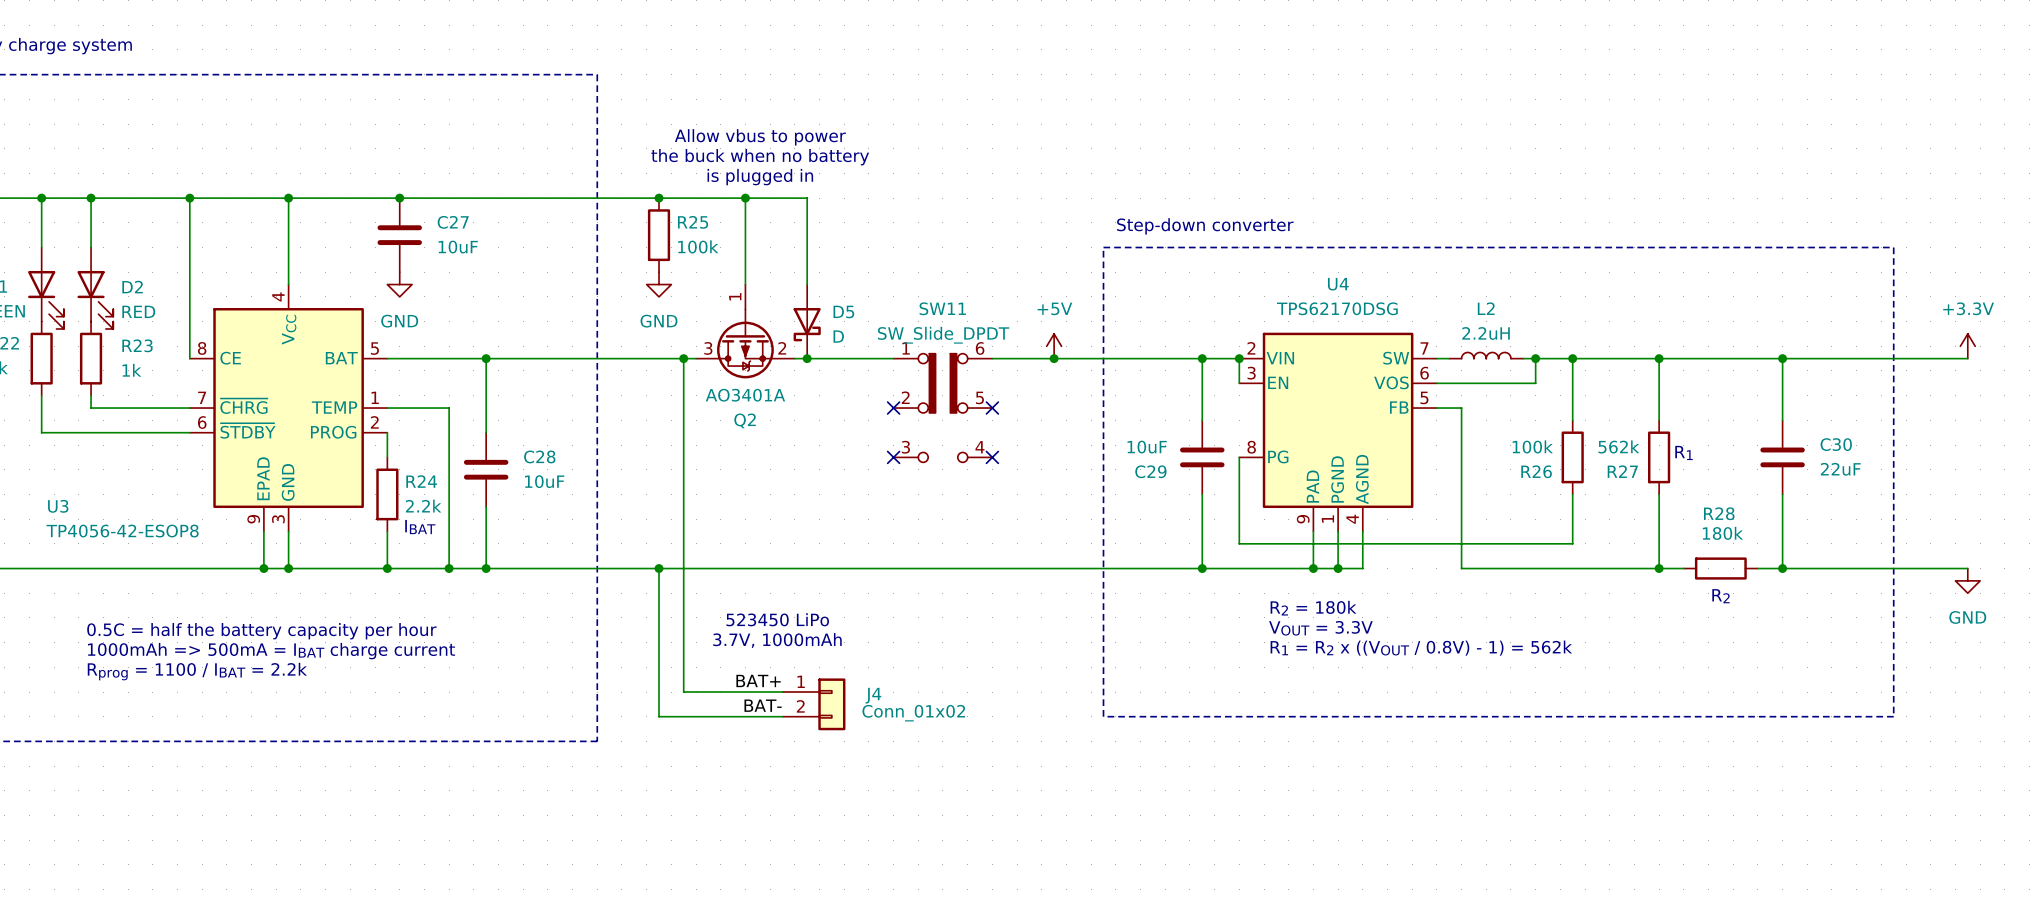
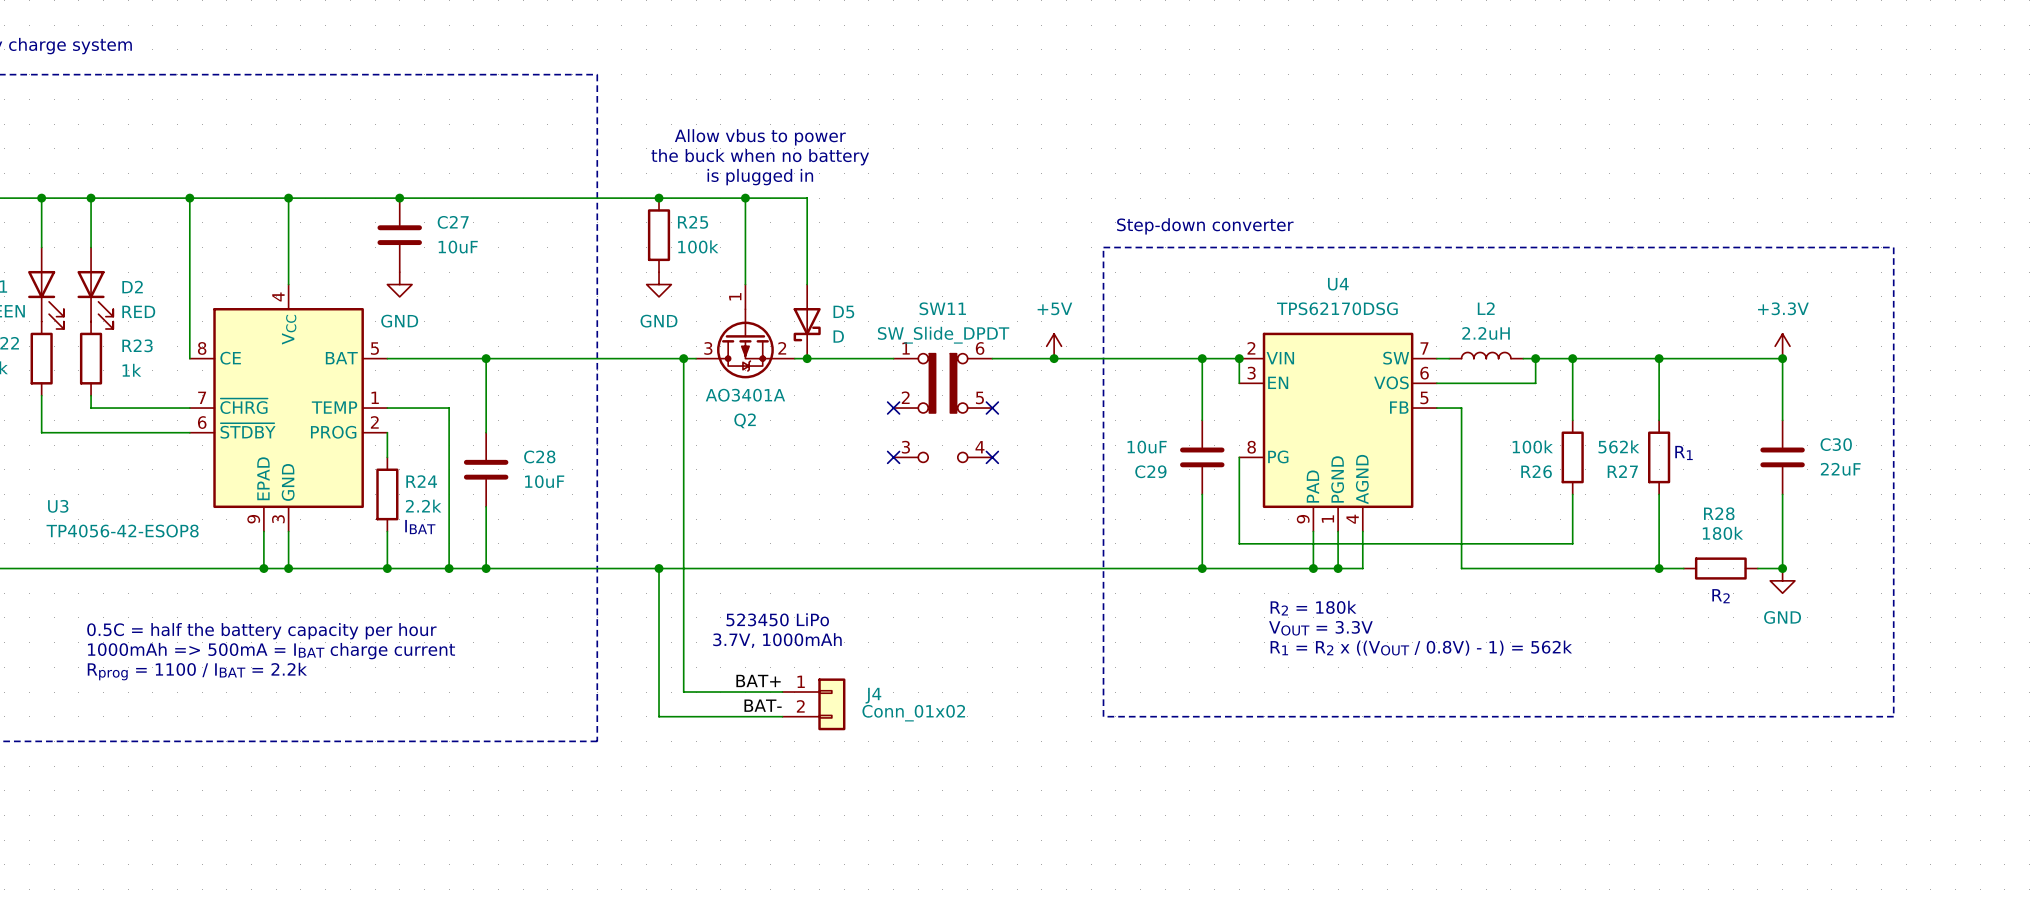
power symbol position: +3.3V (1967, 346) -> +3.3V (1782, 346)
wire: (1782, 358) (1967, 358) -> none
wire: (1782, 568) (1967, 568) -> none
power symbol position: GND (1967, 580) -> GND (1782, 580)

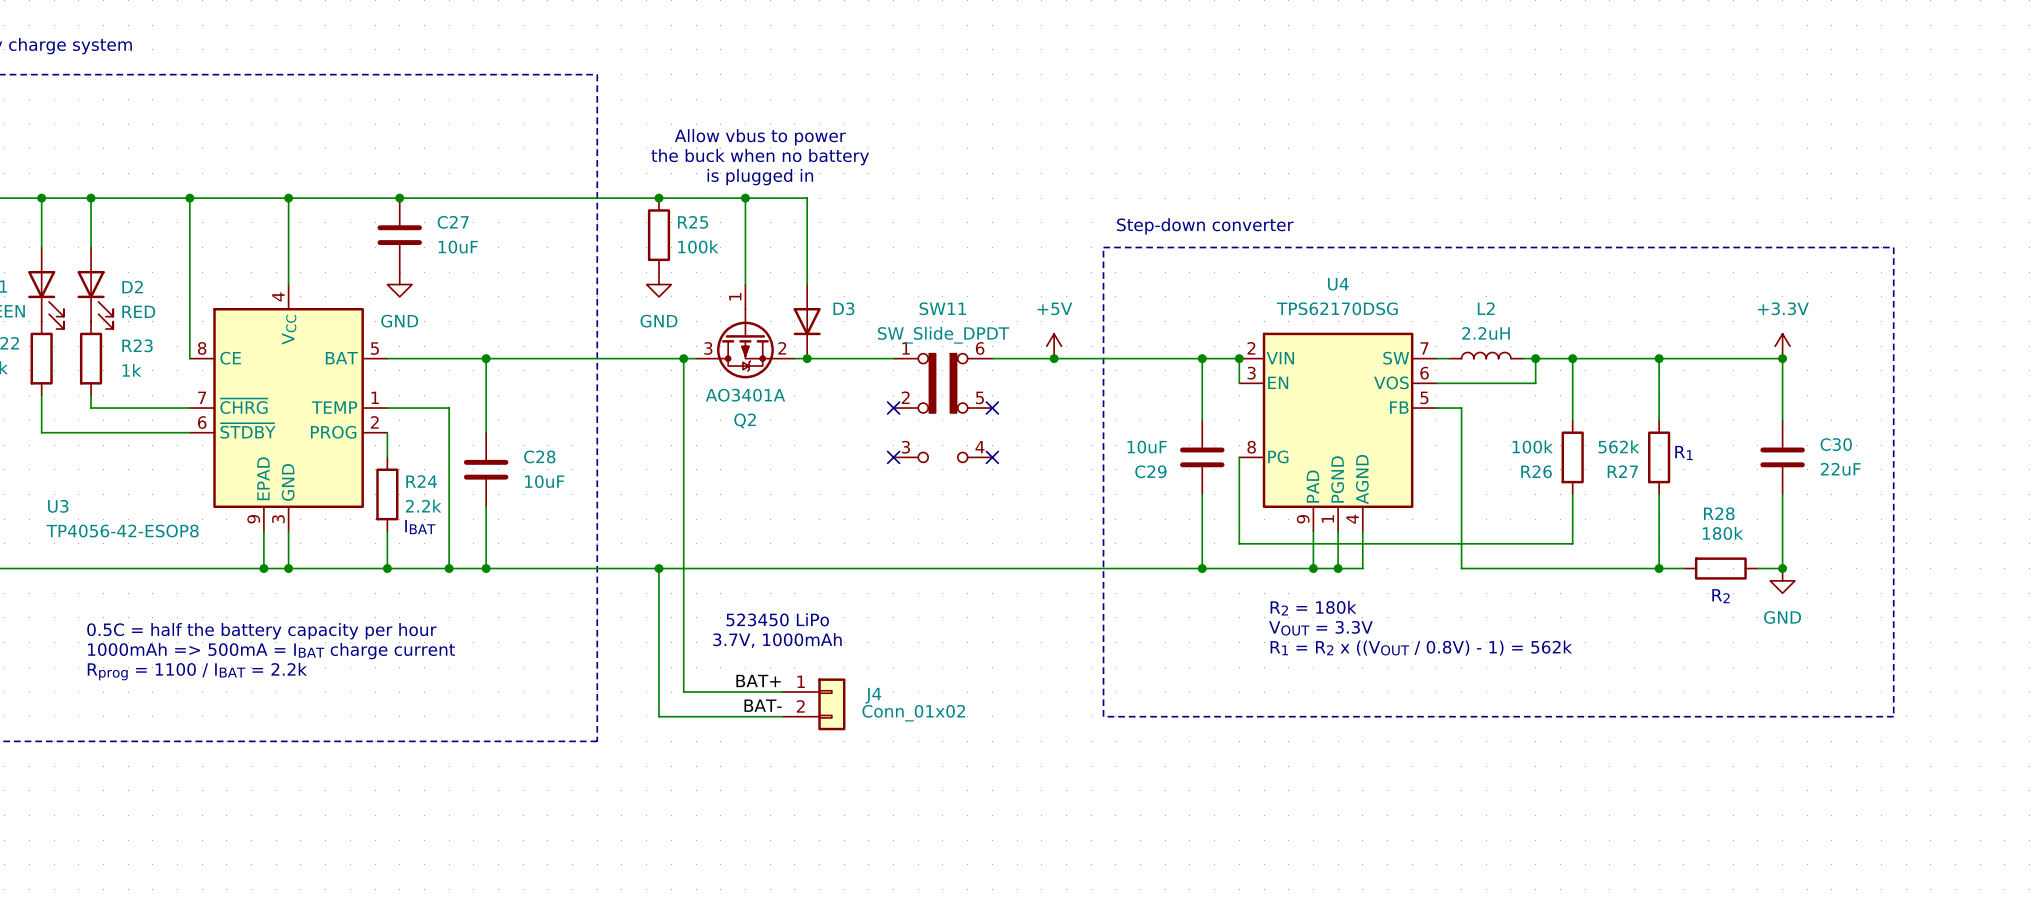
D5: D (807, 321) -> none
D3: none -> (807, 321)

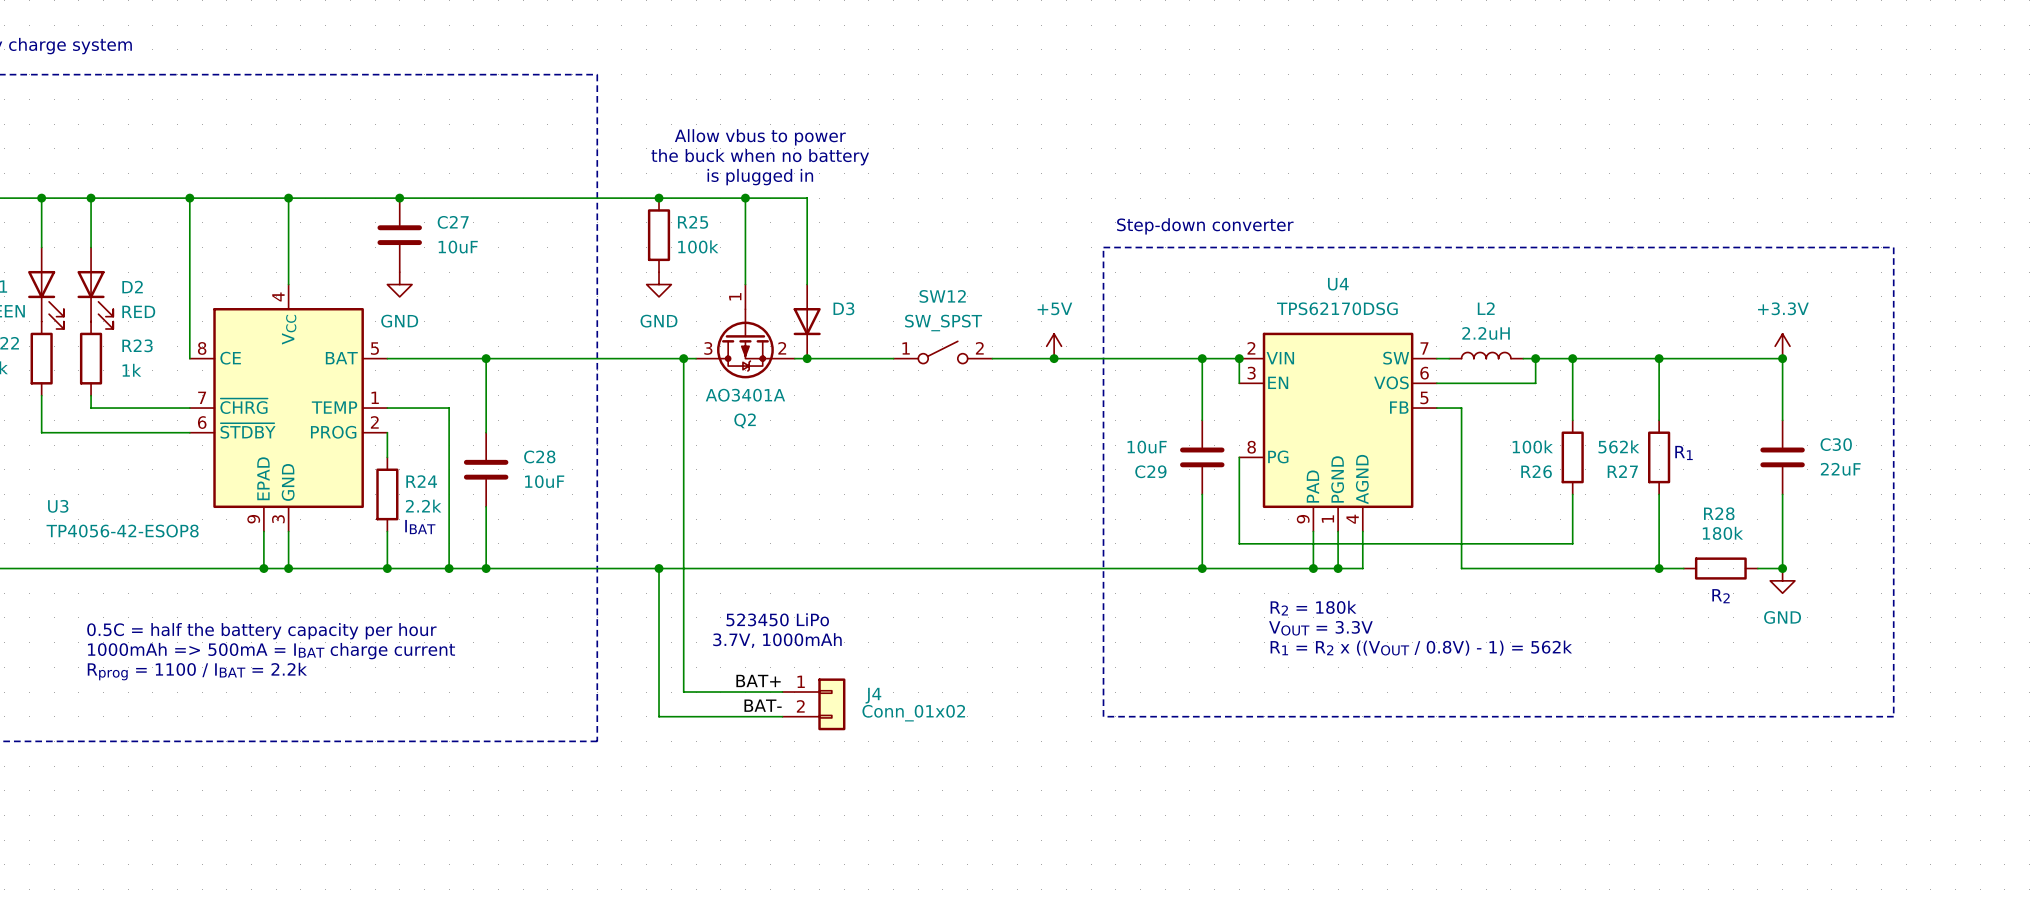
SW12: none -> SW_SPST (942, 352)
no-connect mark: (893, 408) -> none
SW11: SW_Slide_DPDT (942, 408) -> none
no-connect mark: (992, 408) -> none
no-connect mark: (893, 457) -> none
no-connect mark: (992, 457) -> none

